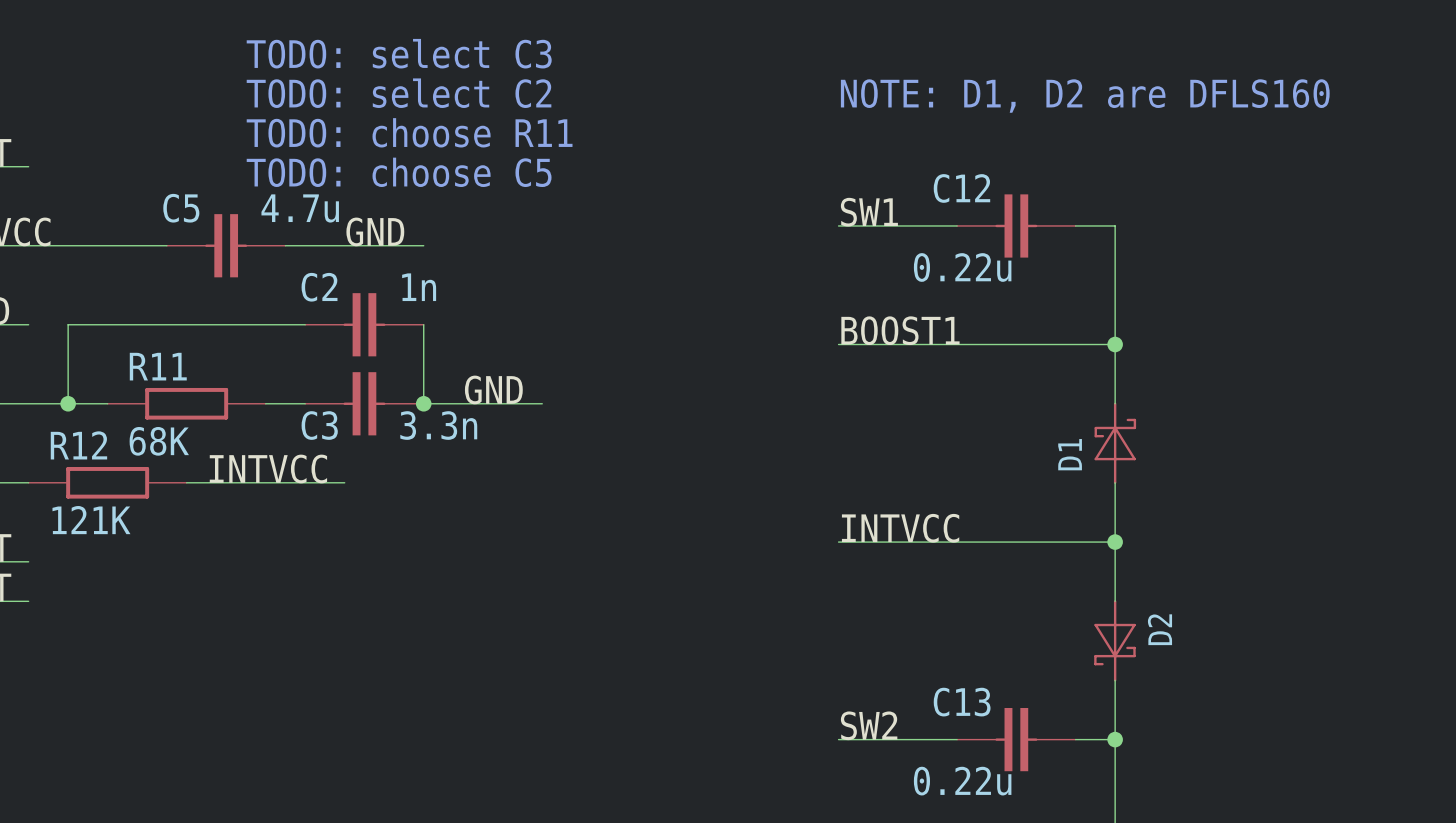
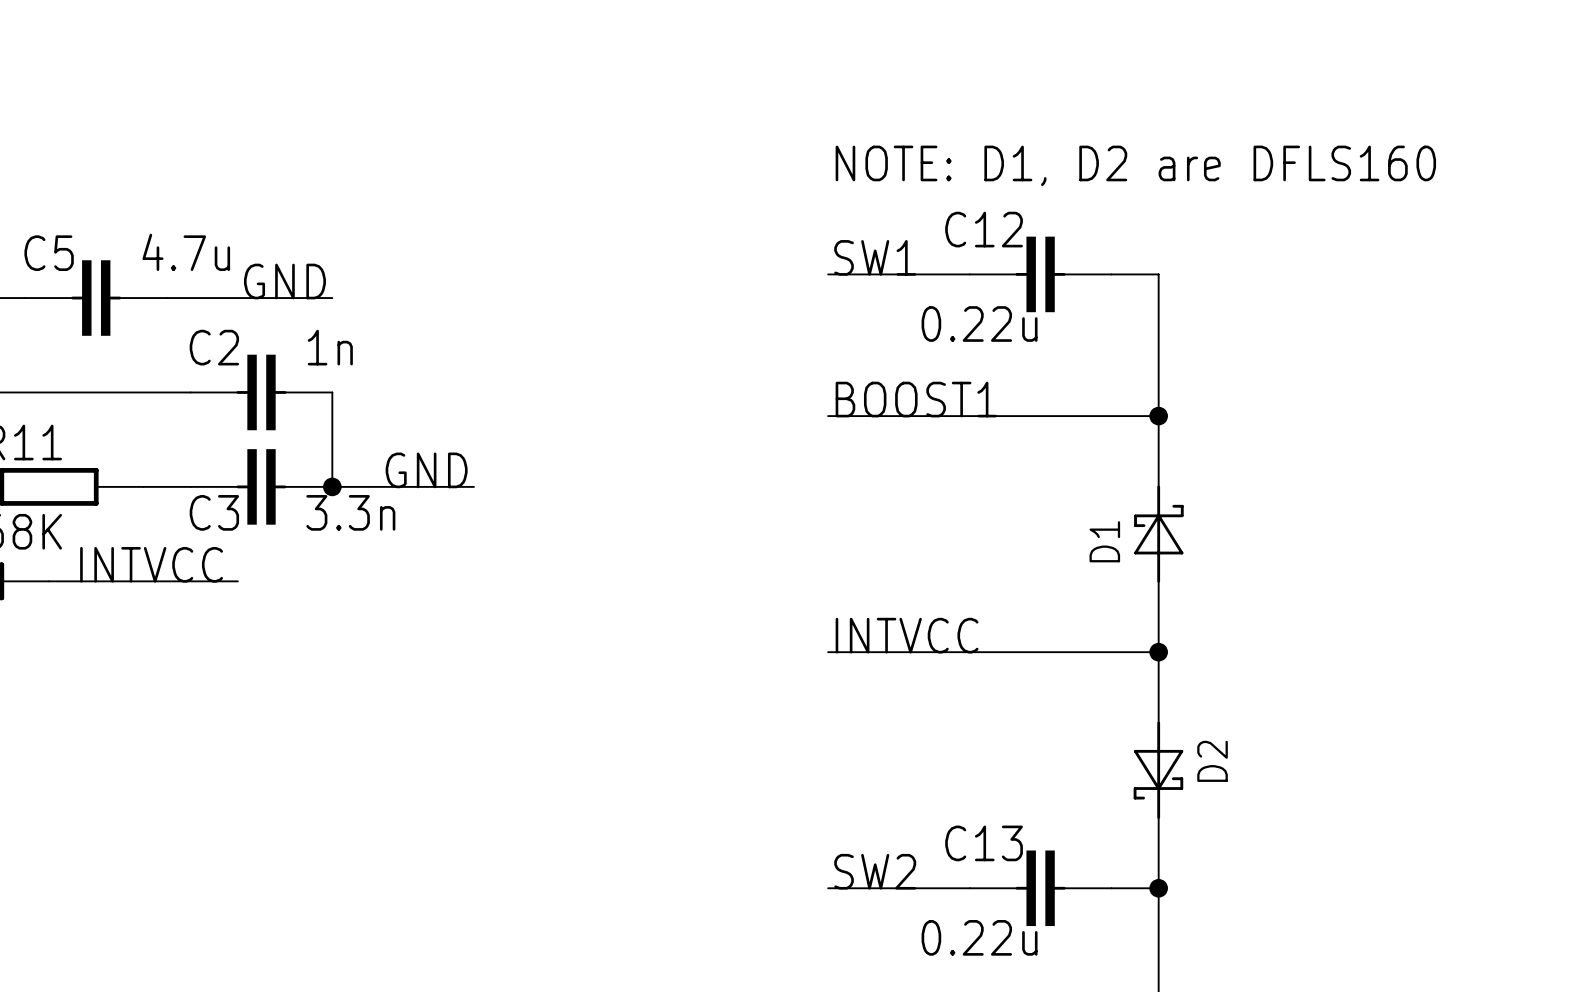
text: TODO: select C3 (399, 53) -> none
text: TODO: select C2 (399, 93) -> none
text position: NOTE: D1, D2 are DFLS160 (1085, 96) -> NOTE: D1, D2 are DFLS160 (1135, 165)
text: TODO: choose R11 (409, 132) -> none
text: TODO: choose C5 (399, 172) -> none

